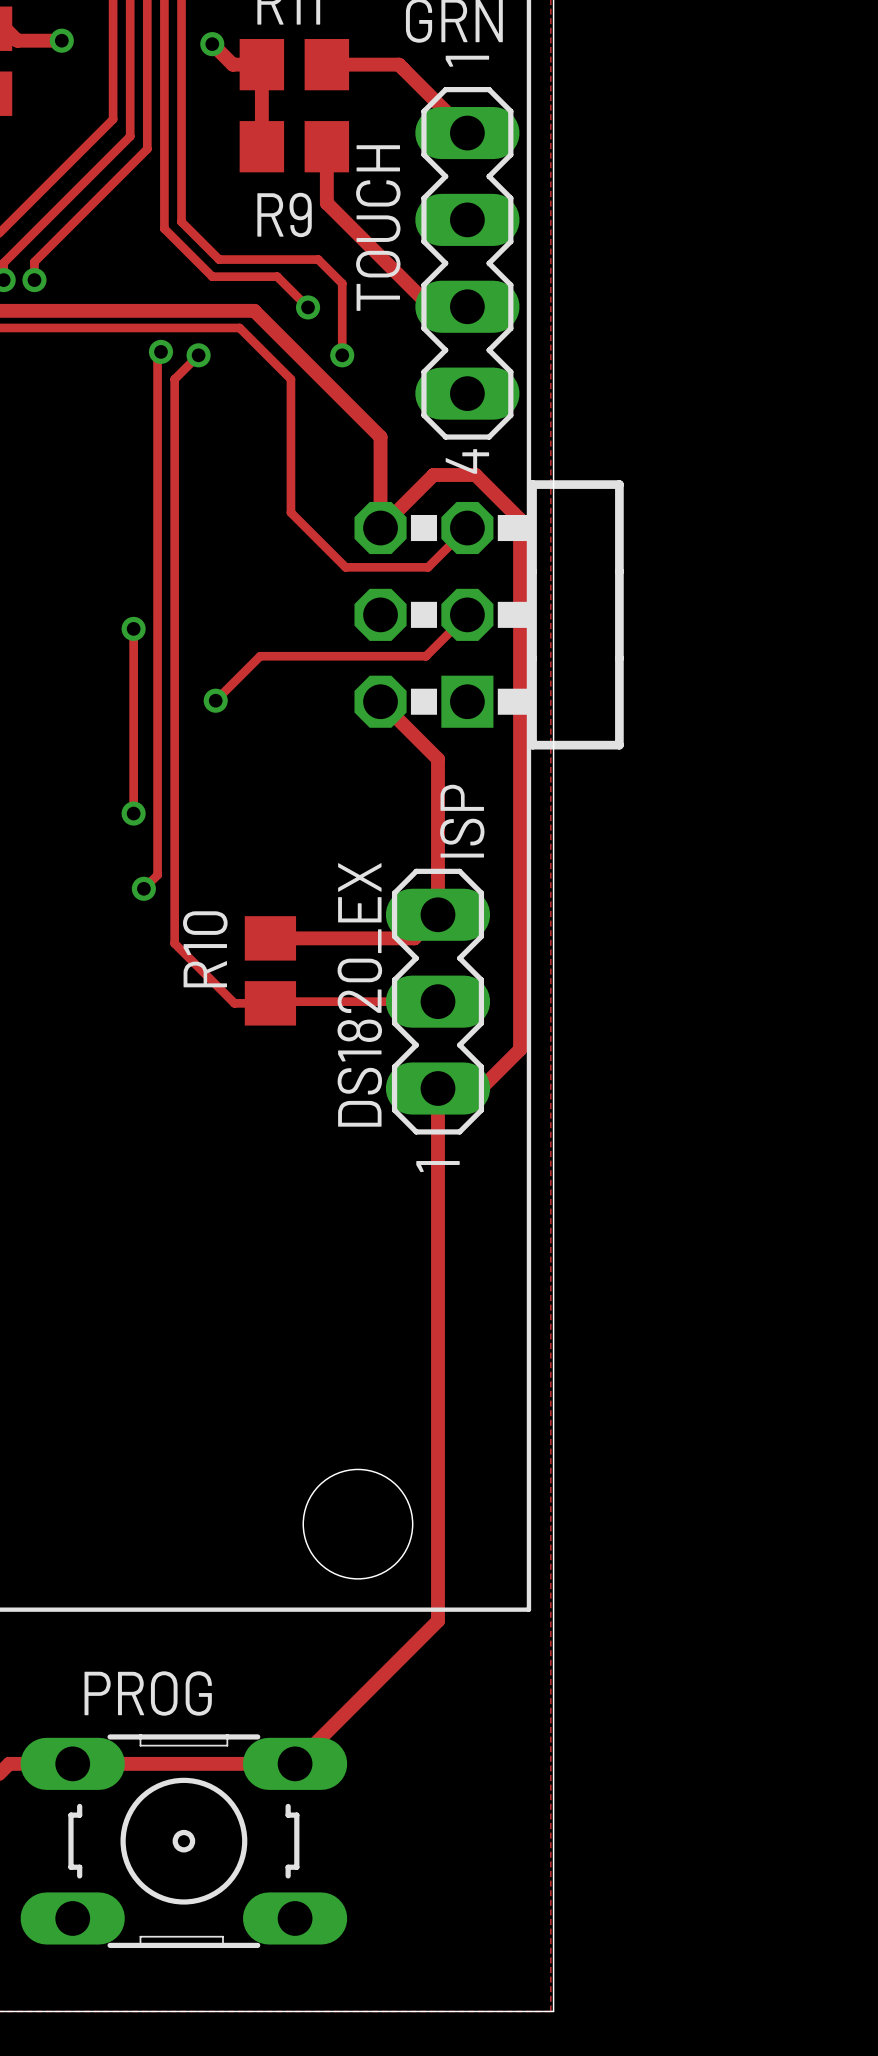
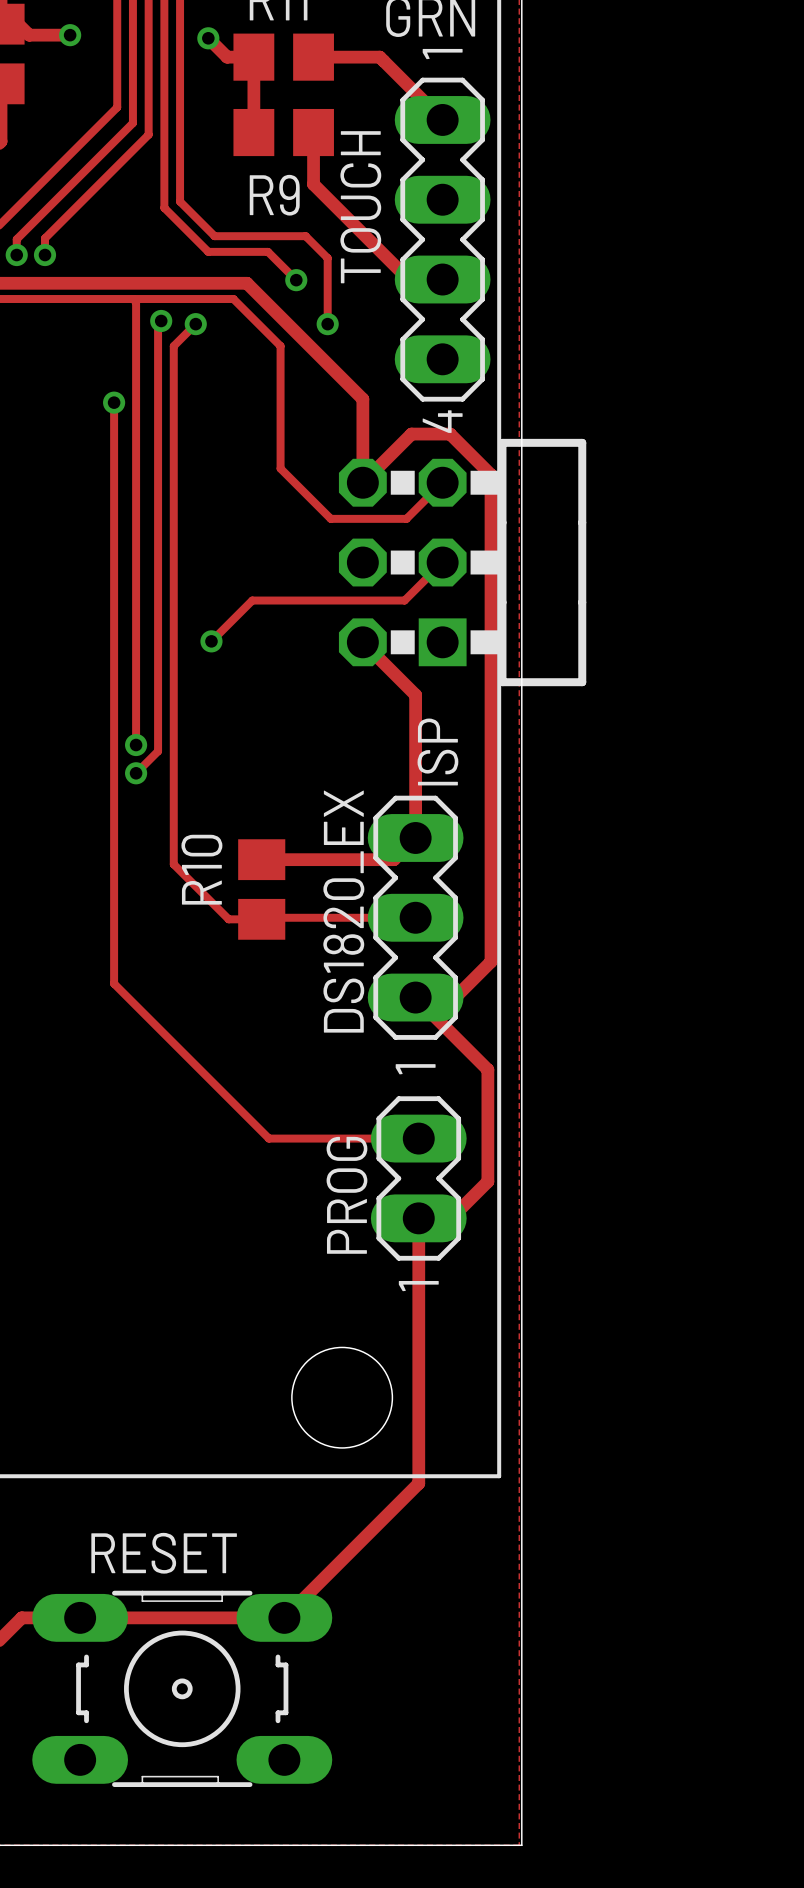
track: none -> (132, 299) (136, 302) (136, 575)
track: none -> (114, 402) (114, 983) (268, 1138) (418, 1138)
via: none -> (114, 402)
via: (133, 628) -> none
track: (157, 820) (157, 875) (143, 888) -> (158, 751) (136, 773)
via position: (143, 888) -> (136, 773)
track: (437, 1088) (437, 1620) -> (415, 997) (487, 1069) (487, 1181) (451, 1218) (418, 1218) (418, 1483) (415, 1486)
PROG: none -> (418, 1178)
PROG name: PROG (148, 1693) -> RESET (164, 1553)

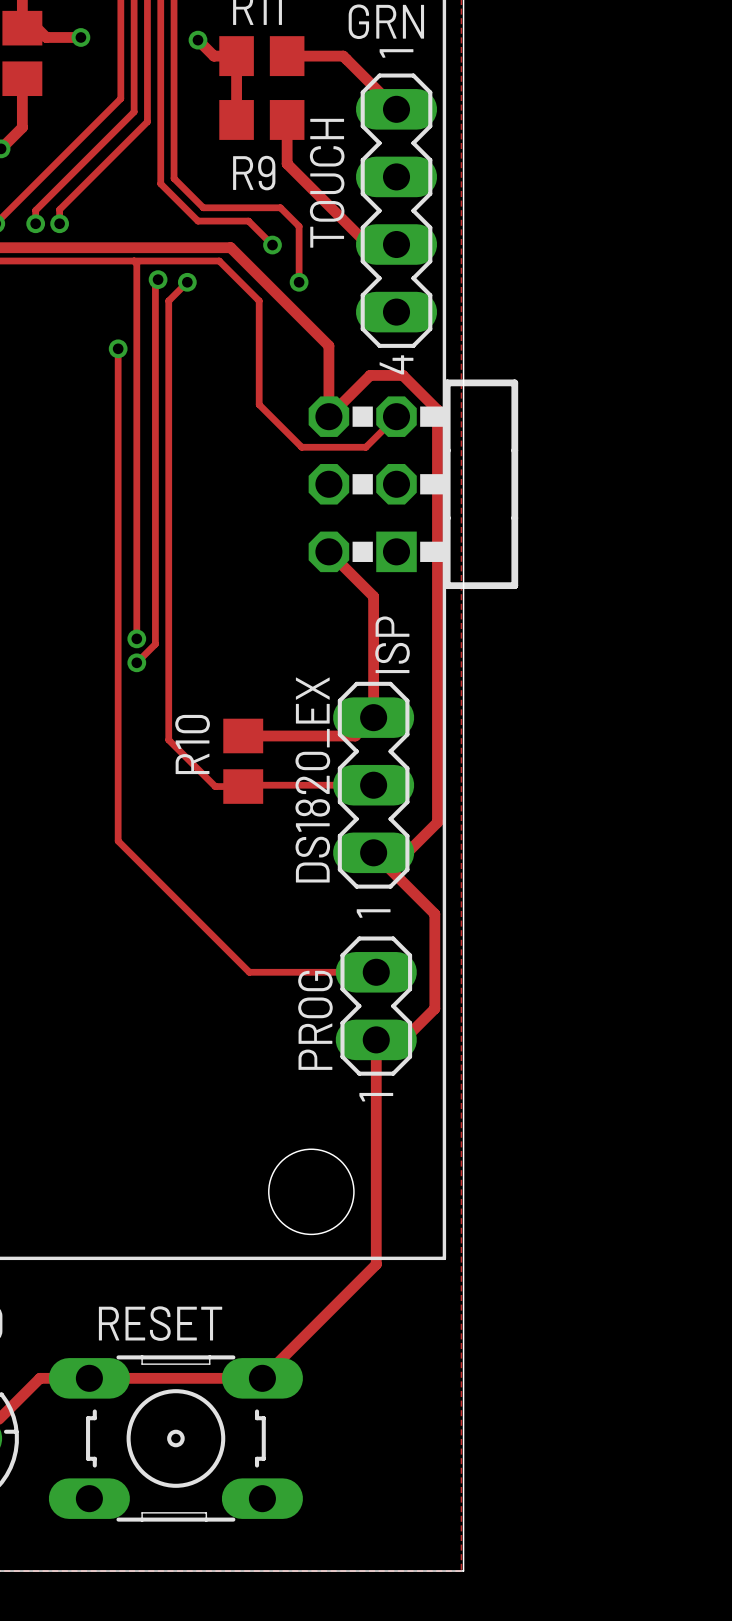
track: (442, 562) (404, 600) (252, 600) (211, 641) -> none
via: (211, 641) -> none

